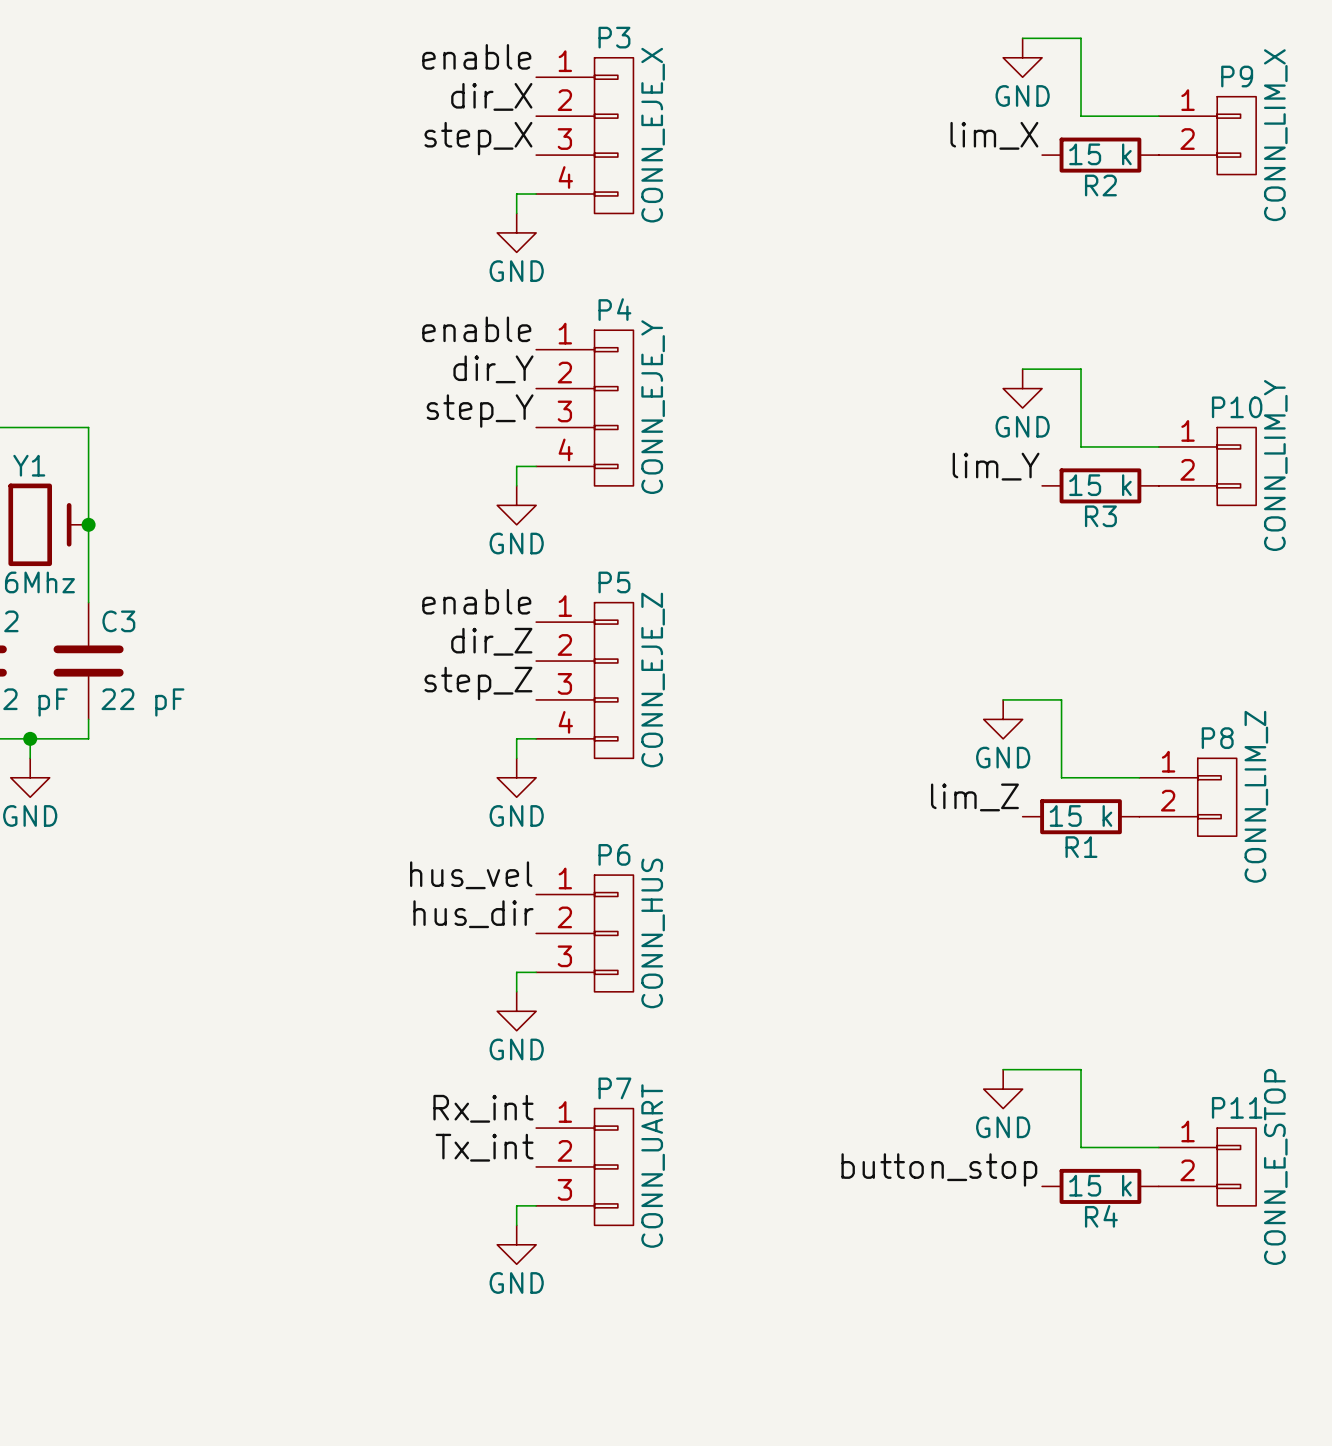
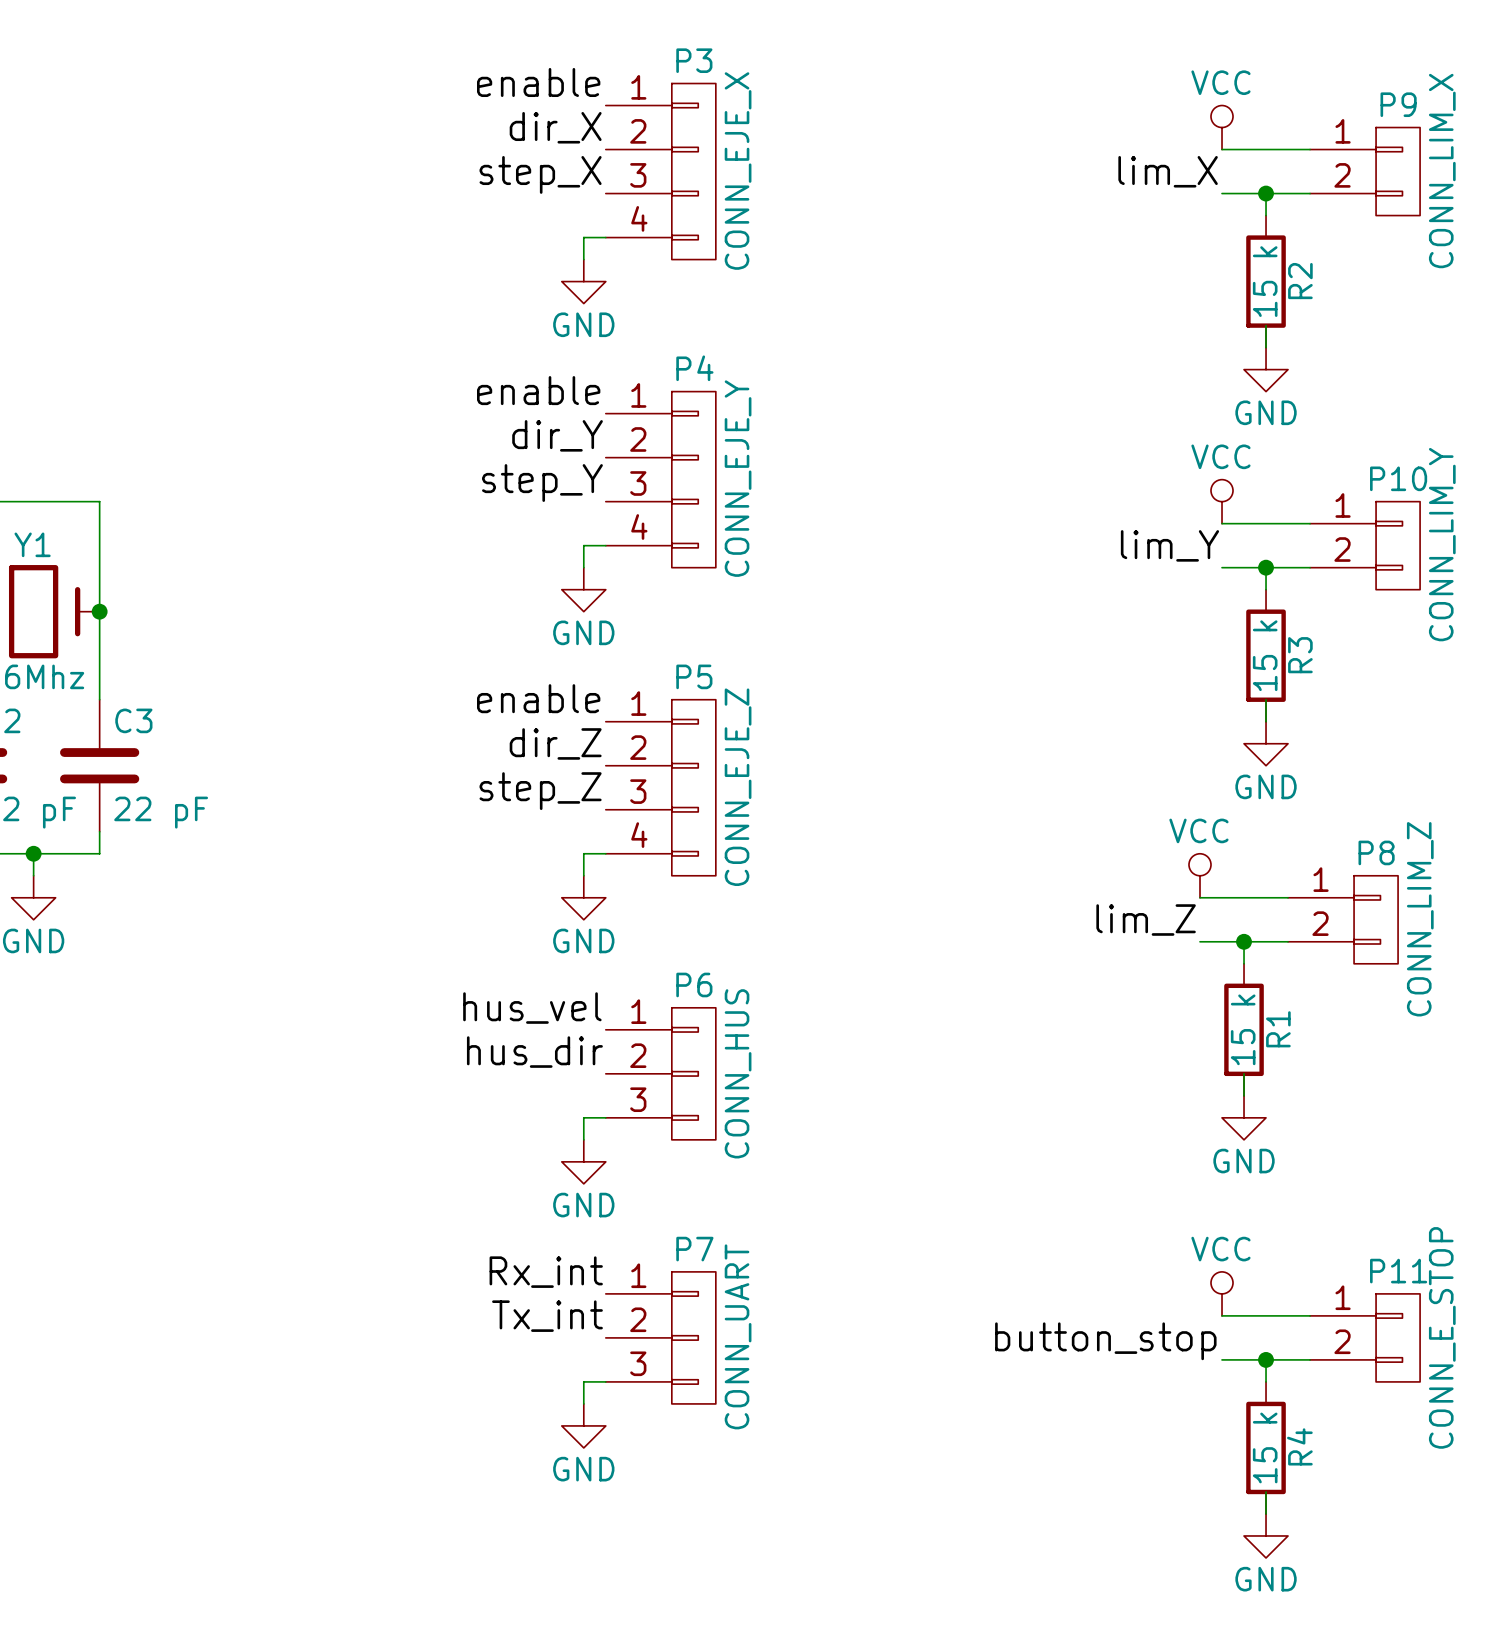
wire: (1022, 38) (1081, 38) (1081, 116) -> none
power symbol: GND (1022, 57) -> none
power symbol: none -> VCC (1222, 127)
label position: lim_X (994, 135) -> lim_X (1168, 171)
wire: none -> (1222, 193) (1310, 193)
R2 rotation: 0° (1100, 155) -> 90° clockwise (1266, 281)
R2 position: (1100, 155) -> (1266, 281)
wire: none -> (1266, 193) (1266, 215)
junction: none -> (1266, 193)
R2 name position: R2 (1100, 185) -> R2 (1300, 281)
wire: none -> (1266, 325) (1266, 347)
wire: (1022, 369) (1081, 369) (1081, 446) -> none
power symbol position: GND (1022, 388) -> GND (1266, 369)
power symbol: none -> VCC (1222, 501)
label position: lim_Y (996, 466) -> lim_Y (1169, 545)
wire: none -> (1222, 567) (1310, 567)
R3 rotation: 0° (1100, 485) -> 90° clockwise (1266, 655)
R3 position: (1100, 485) -> (1266, 655)
wire: none -> (1266, 567) (1266, 589)
junction: none -> (1266, 567)
R3 name position: R3 (1100, 516) -> R3 (1300, 655)
wire: none -> (1266, 699) (1266, 721)
power symbol: none -> GND (1266, 743)
wire: (1003, 699) (1061, 699) (1061, 777) -> none
power symbol: GND (1003, 719) -> none
power symbol: none -> VCC (1200, 875)
label position: lim_Z (974, 797) -> lim_Z (1146, 920)
wire: none -> (1200, 941) (1288, 941)
R1 rotation: 0° (1081, 816) -> 90° clockwise (1244, 1029)
R1 position: (1081, 816) -> (1244, 1029)
wire: none -> (1244, 941) (1244, 963)
junction: none -> (1244, 941)
R1 name position: R1 (1081, 847) -> R1 (1278, 1029)
wire: none -> (1244, 1073) (1244, 1095)
power symbol: none -> GND (1244, 1117)
wire: (1003, 1069) (1081, 1069) (1081, 1147) -> none
power symbol: GND (1003, 1089) -> none
power symbol: none -> VCC (1222, 1293)
label position: button_stop (939, 1169) -> button_stop (1105, 1341)
wire: none -> (1222, 1359) (1310, 1359)
R4 rotation: 0° (1100, 1186) -> 90° clockwise (1266, 1447)
R4 position: (1100, 1186) -> (1266, 1447)
wire: none -> (1266, 1359) (1266, 1381)
junction: none -> (1266, 1359)
R4 name position: R4 (1101, 1216) -> R4 (1299, 1446)
wire: none -> (1266, 1491) (1266, 1513)
power symbol: none -> GND (1266, 1535)

